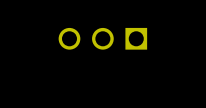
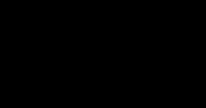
part: (102, 38) -> none

